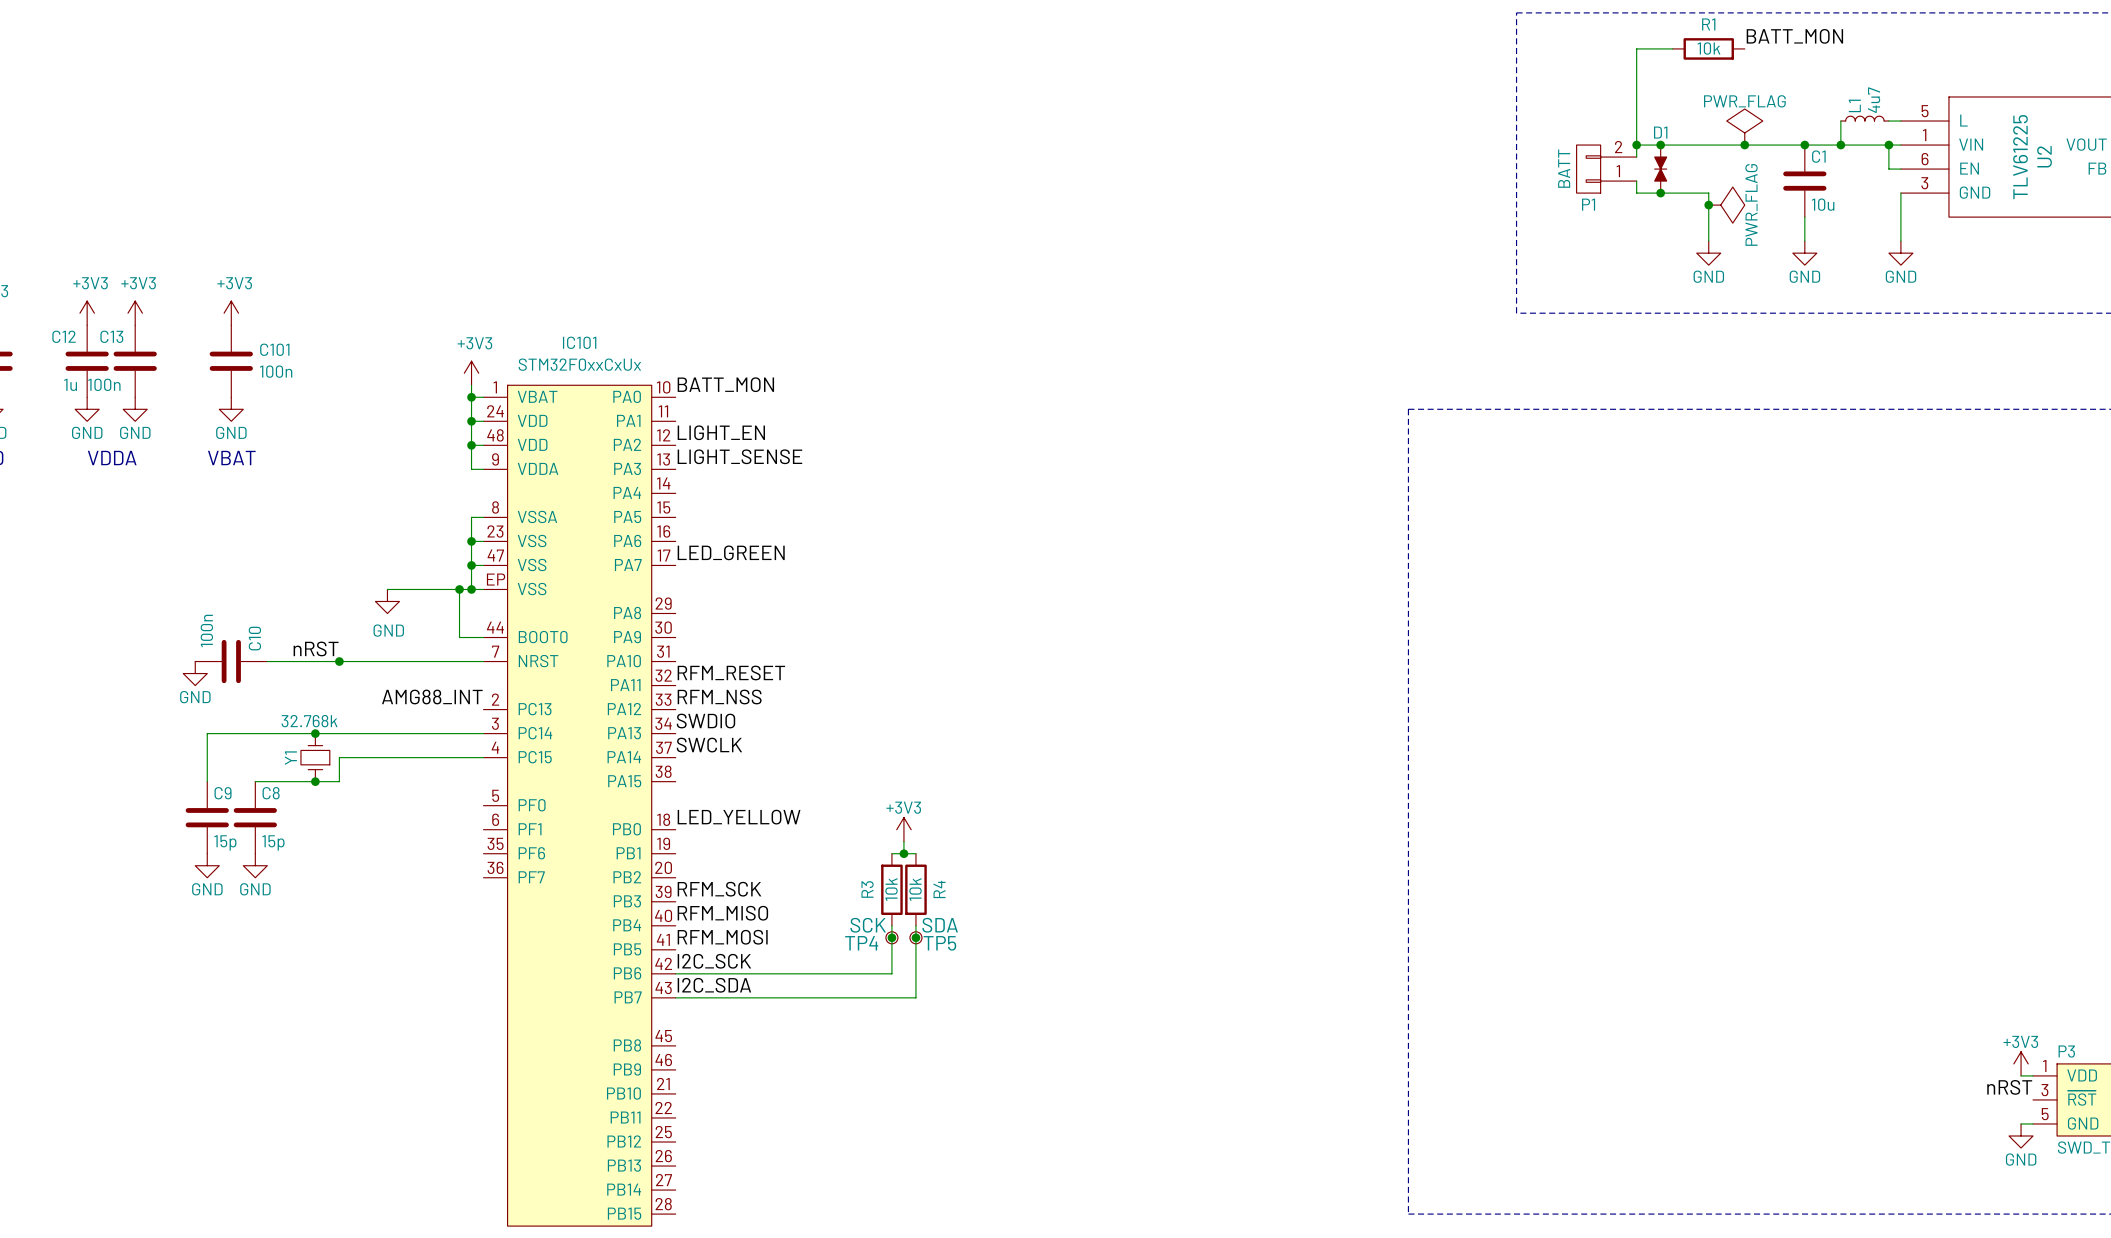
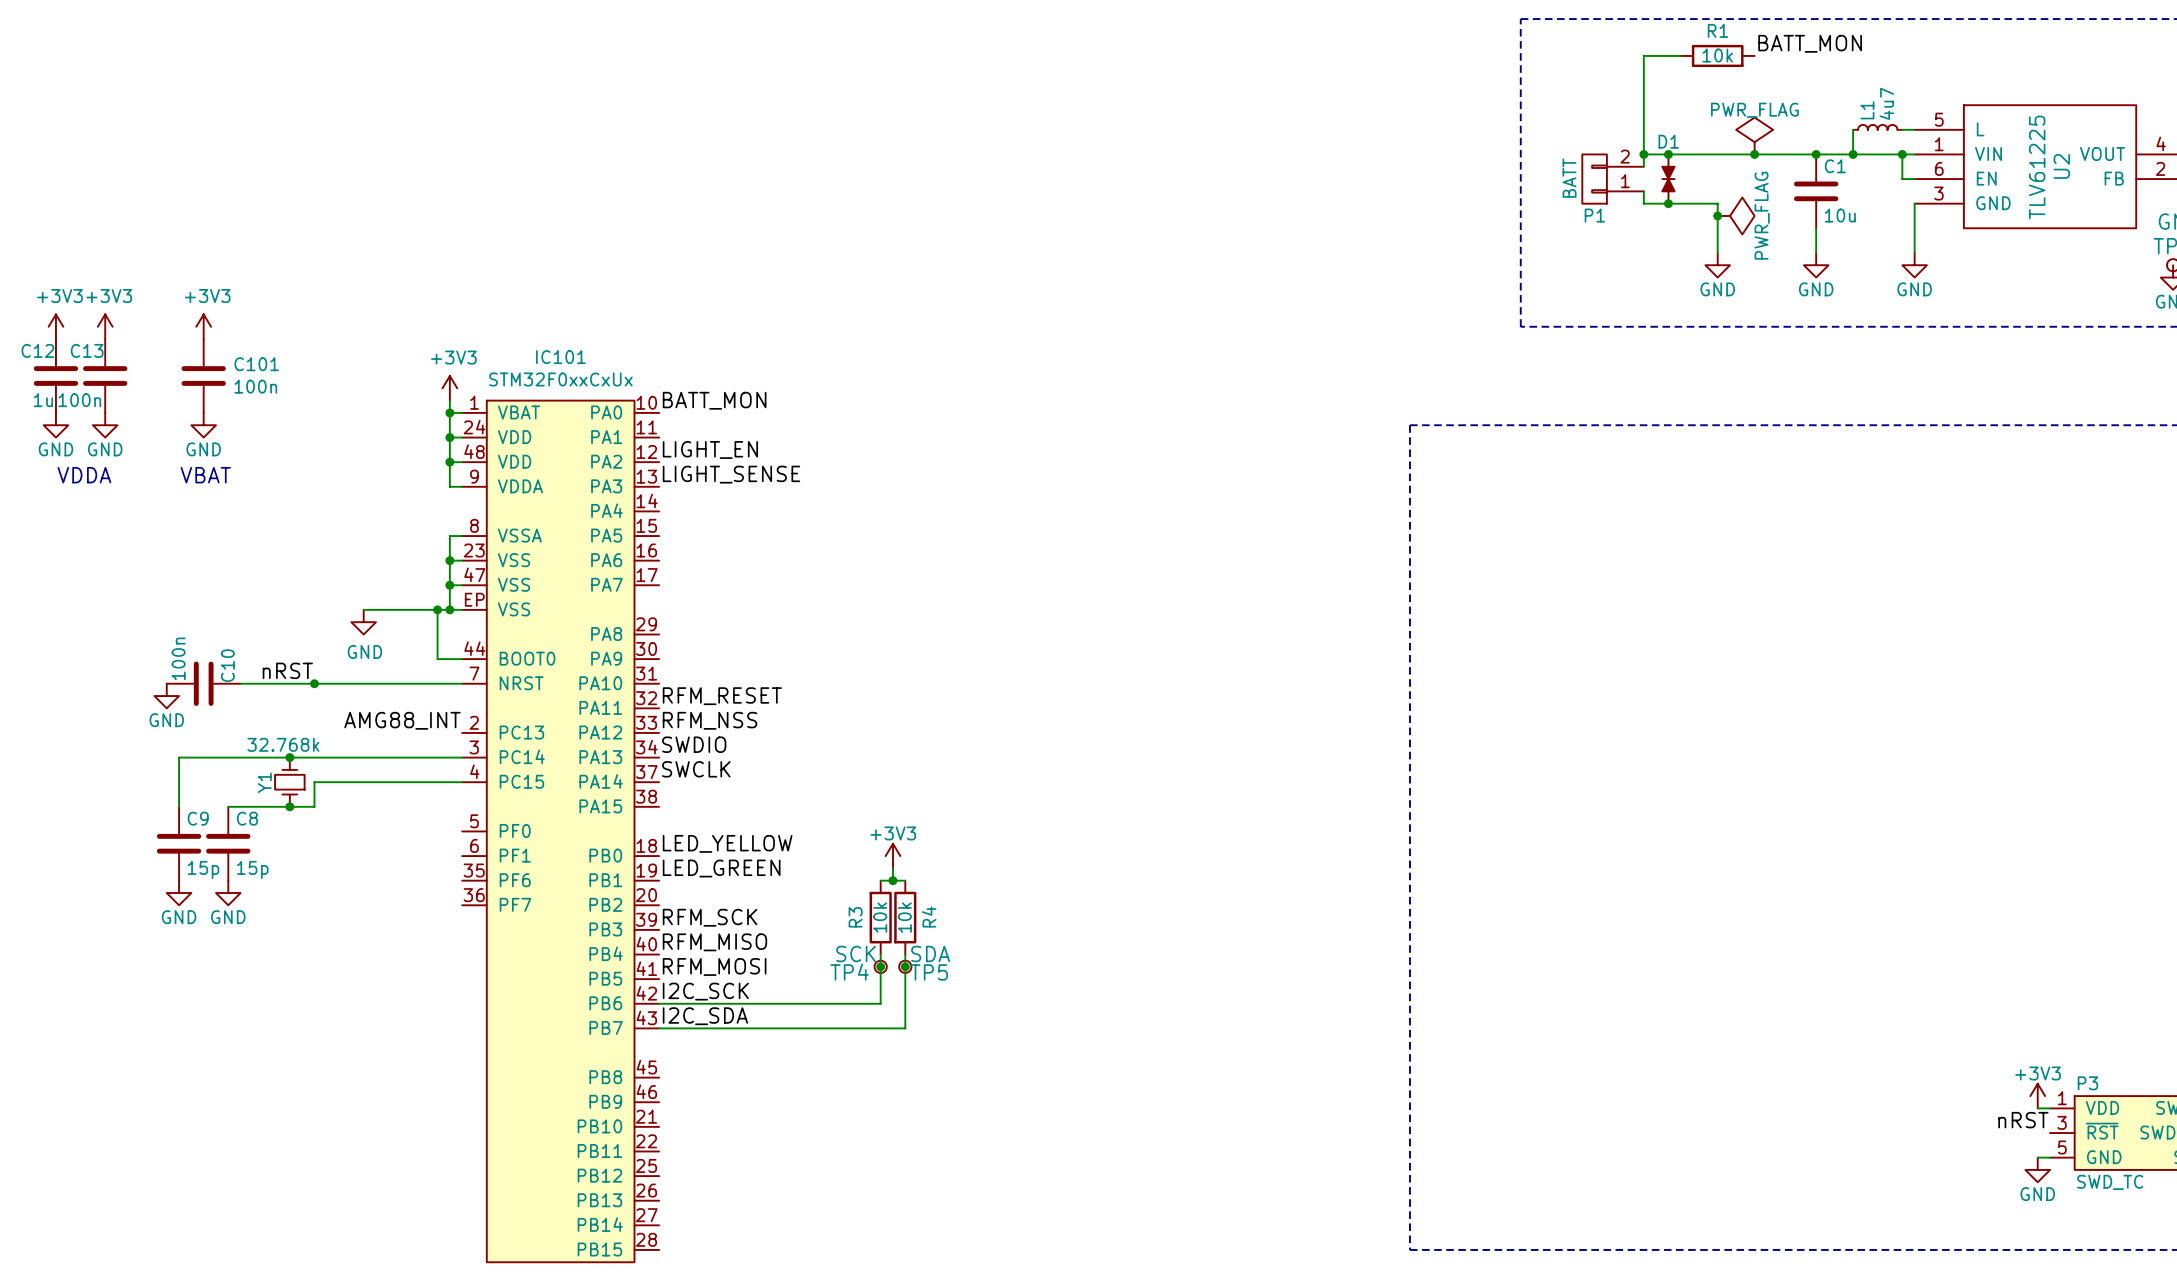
label: LED_GREEN (731, 552) -> none
label: none -> LED_GREEN (721, 868)

